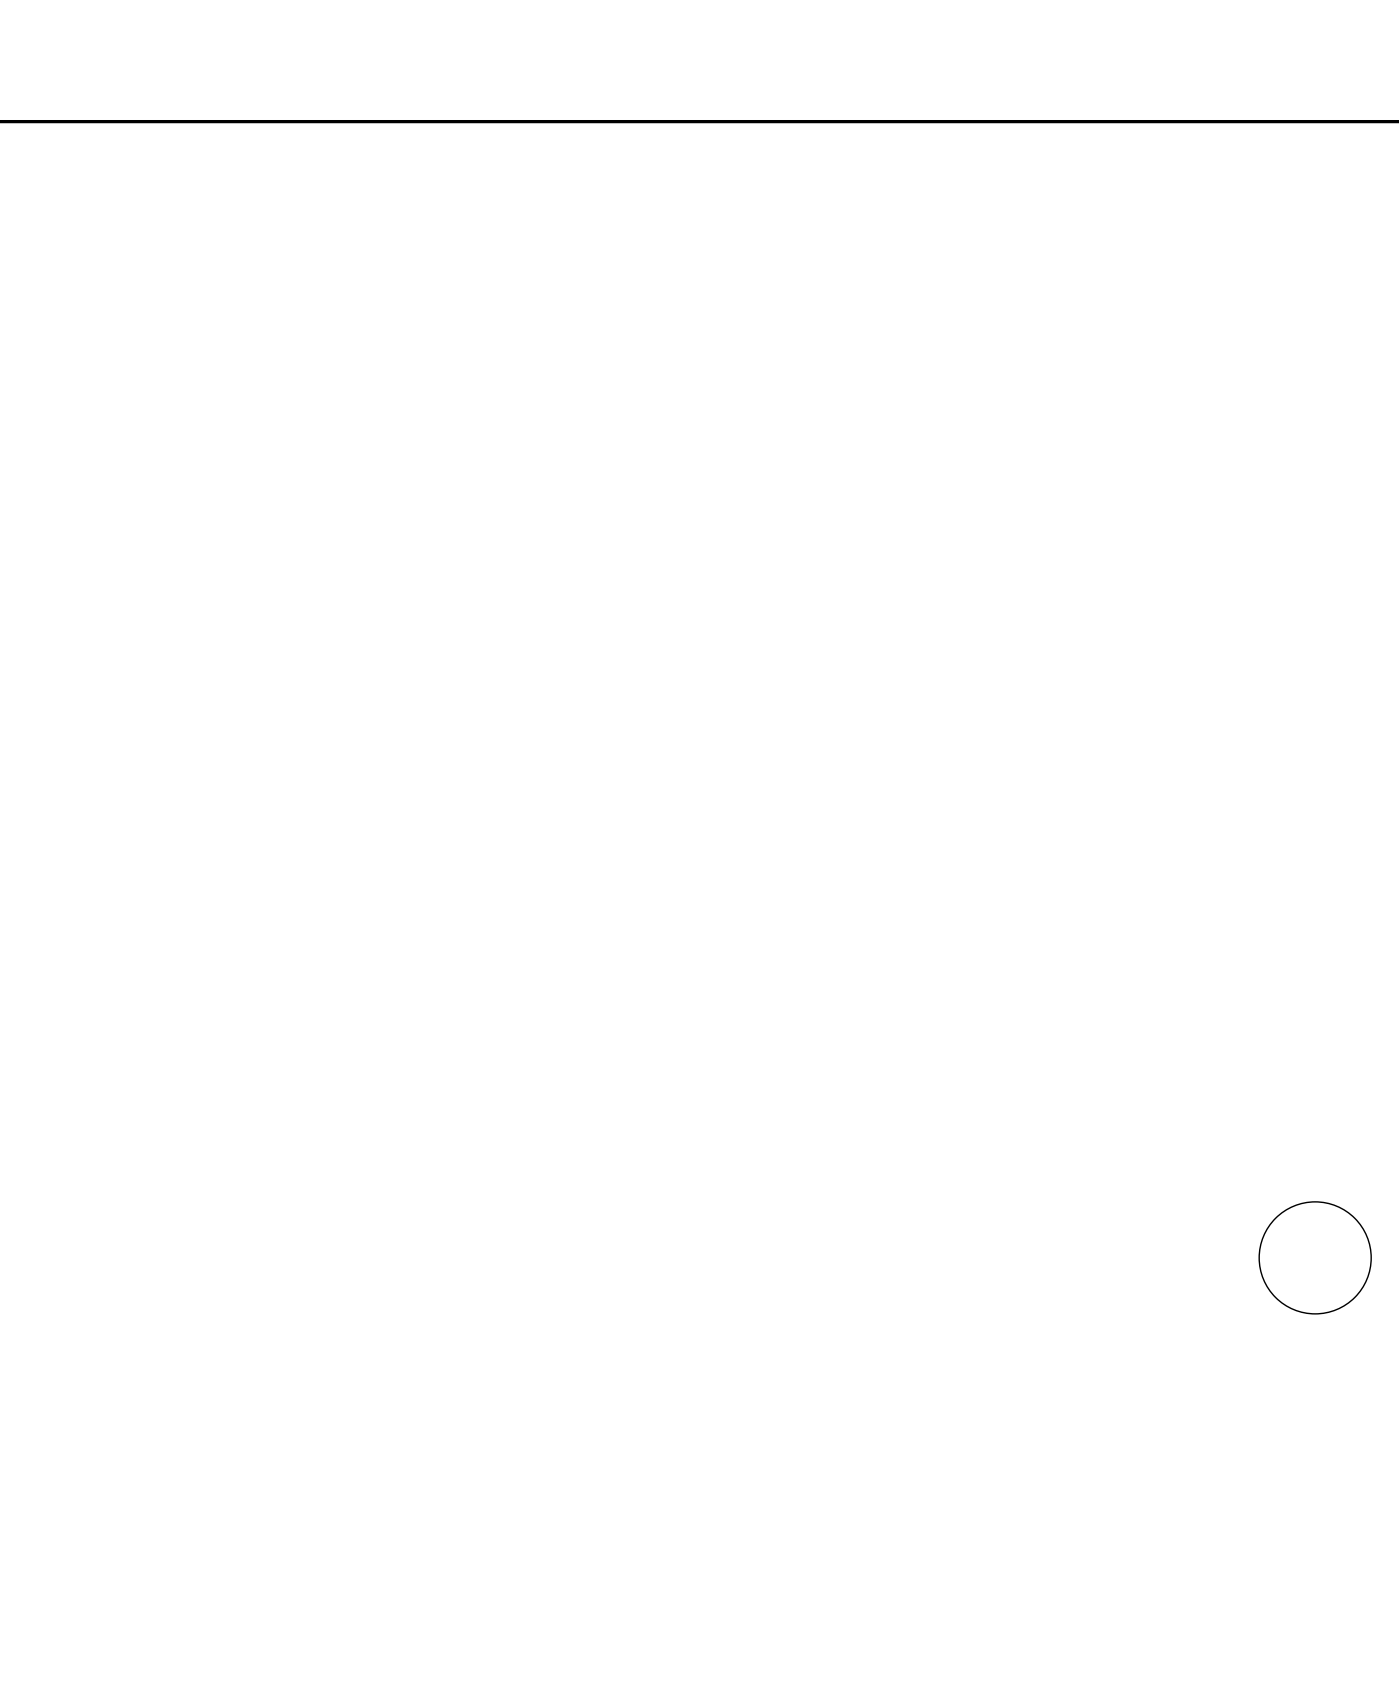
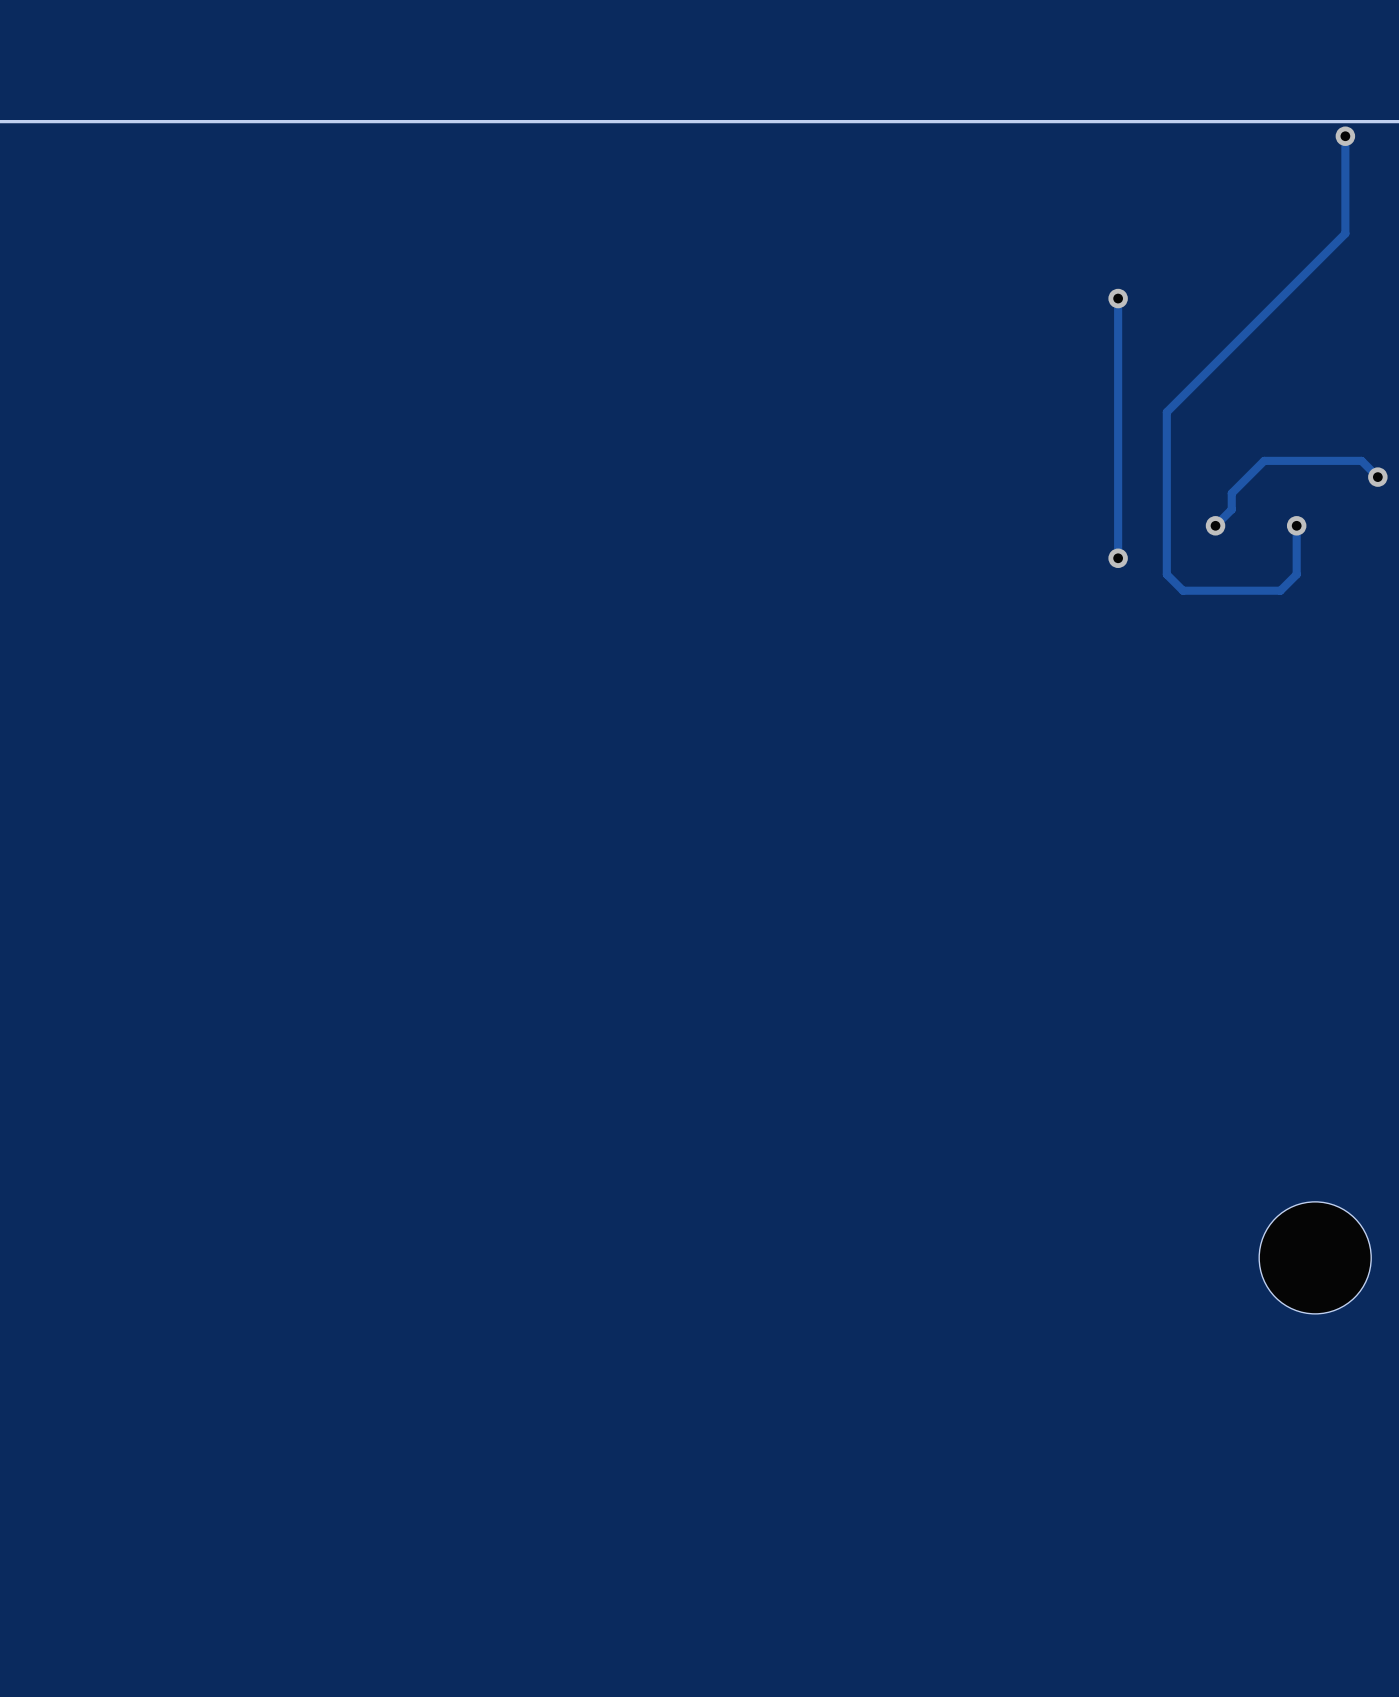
track: none -> (1345, 136) (1345, 233) (1166, 412) (1166, 574) (1183, 590) (1280, 590) (1296, 574) (1296, 525)
via: none -> (1345, 136)
track: none -> (1118, 298) (1118, 558)
via: none -> (1118, 298)
track: none -> (1377, 477) (1361, 460) (1264, 460) (1231, 493) (1231, 509) (1215, 525)
via: none -> (1377, 477)
via: none -> (1215, 525)
via: none -> (1296, 525)
via: none -> (1118, 558)

